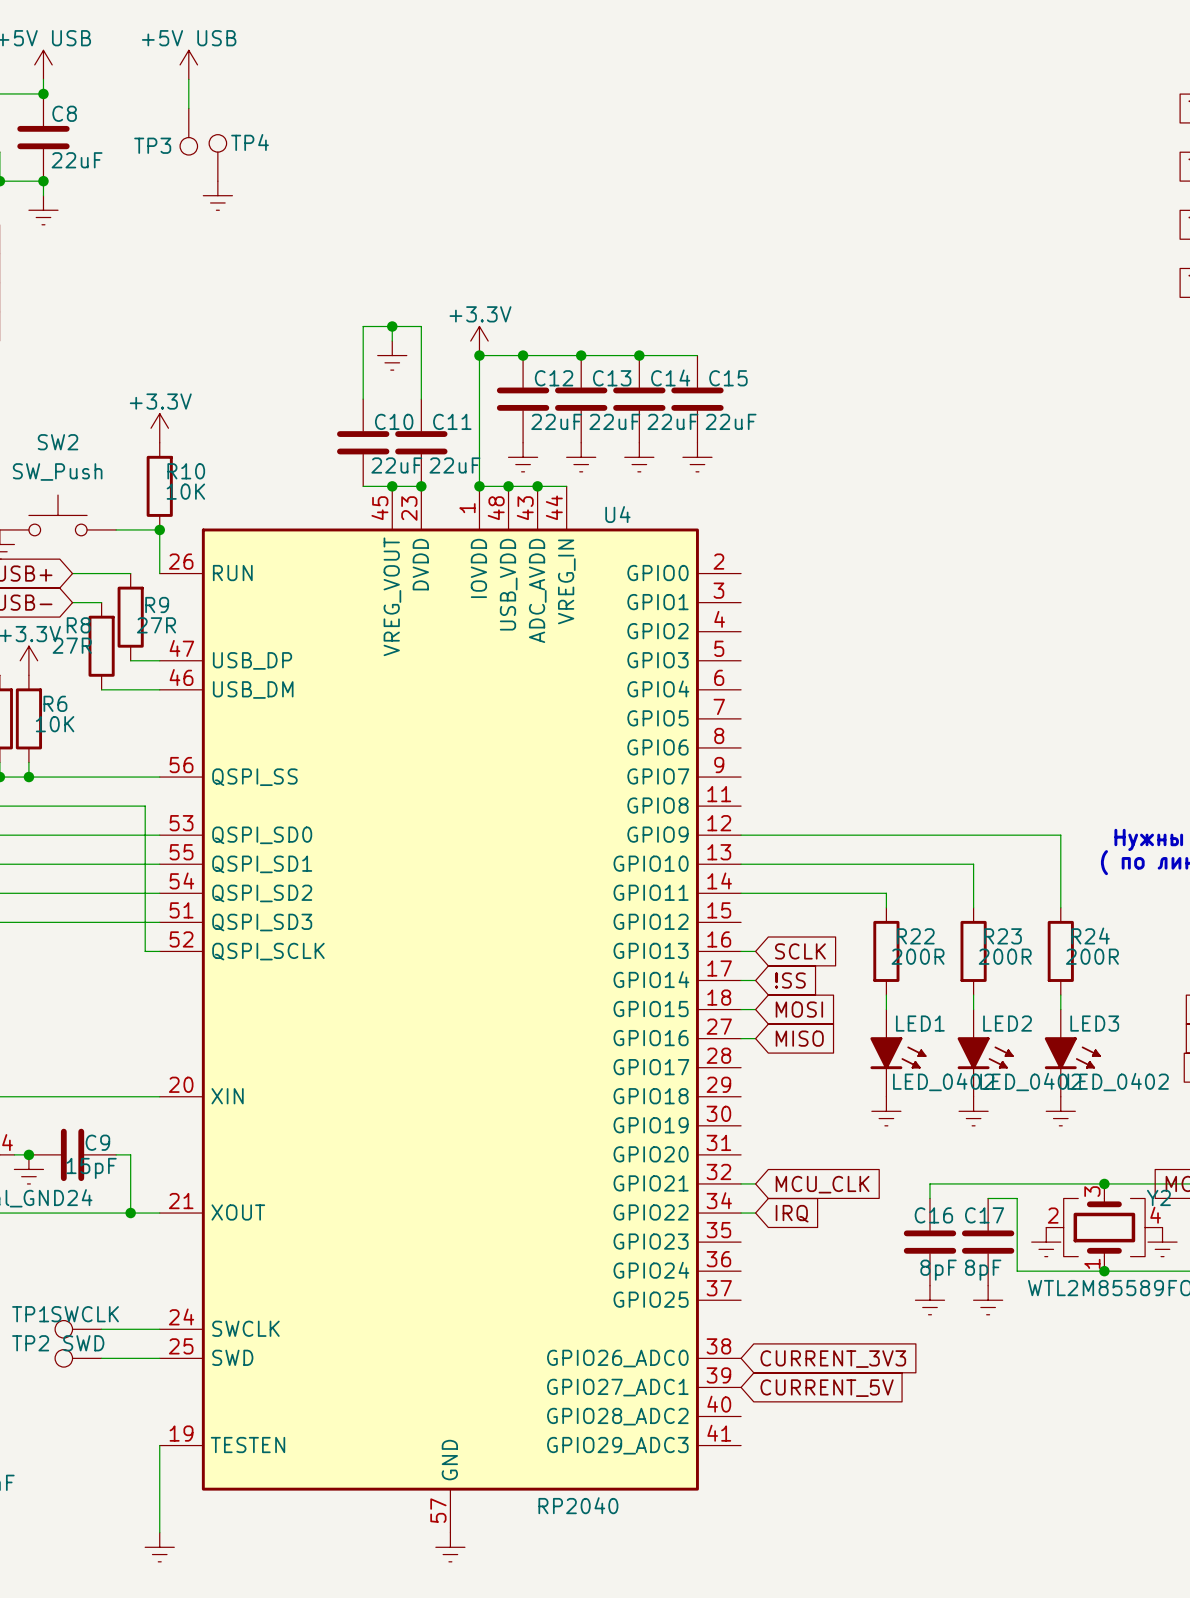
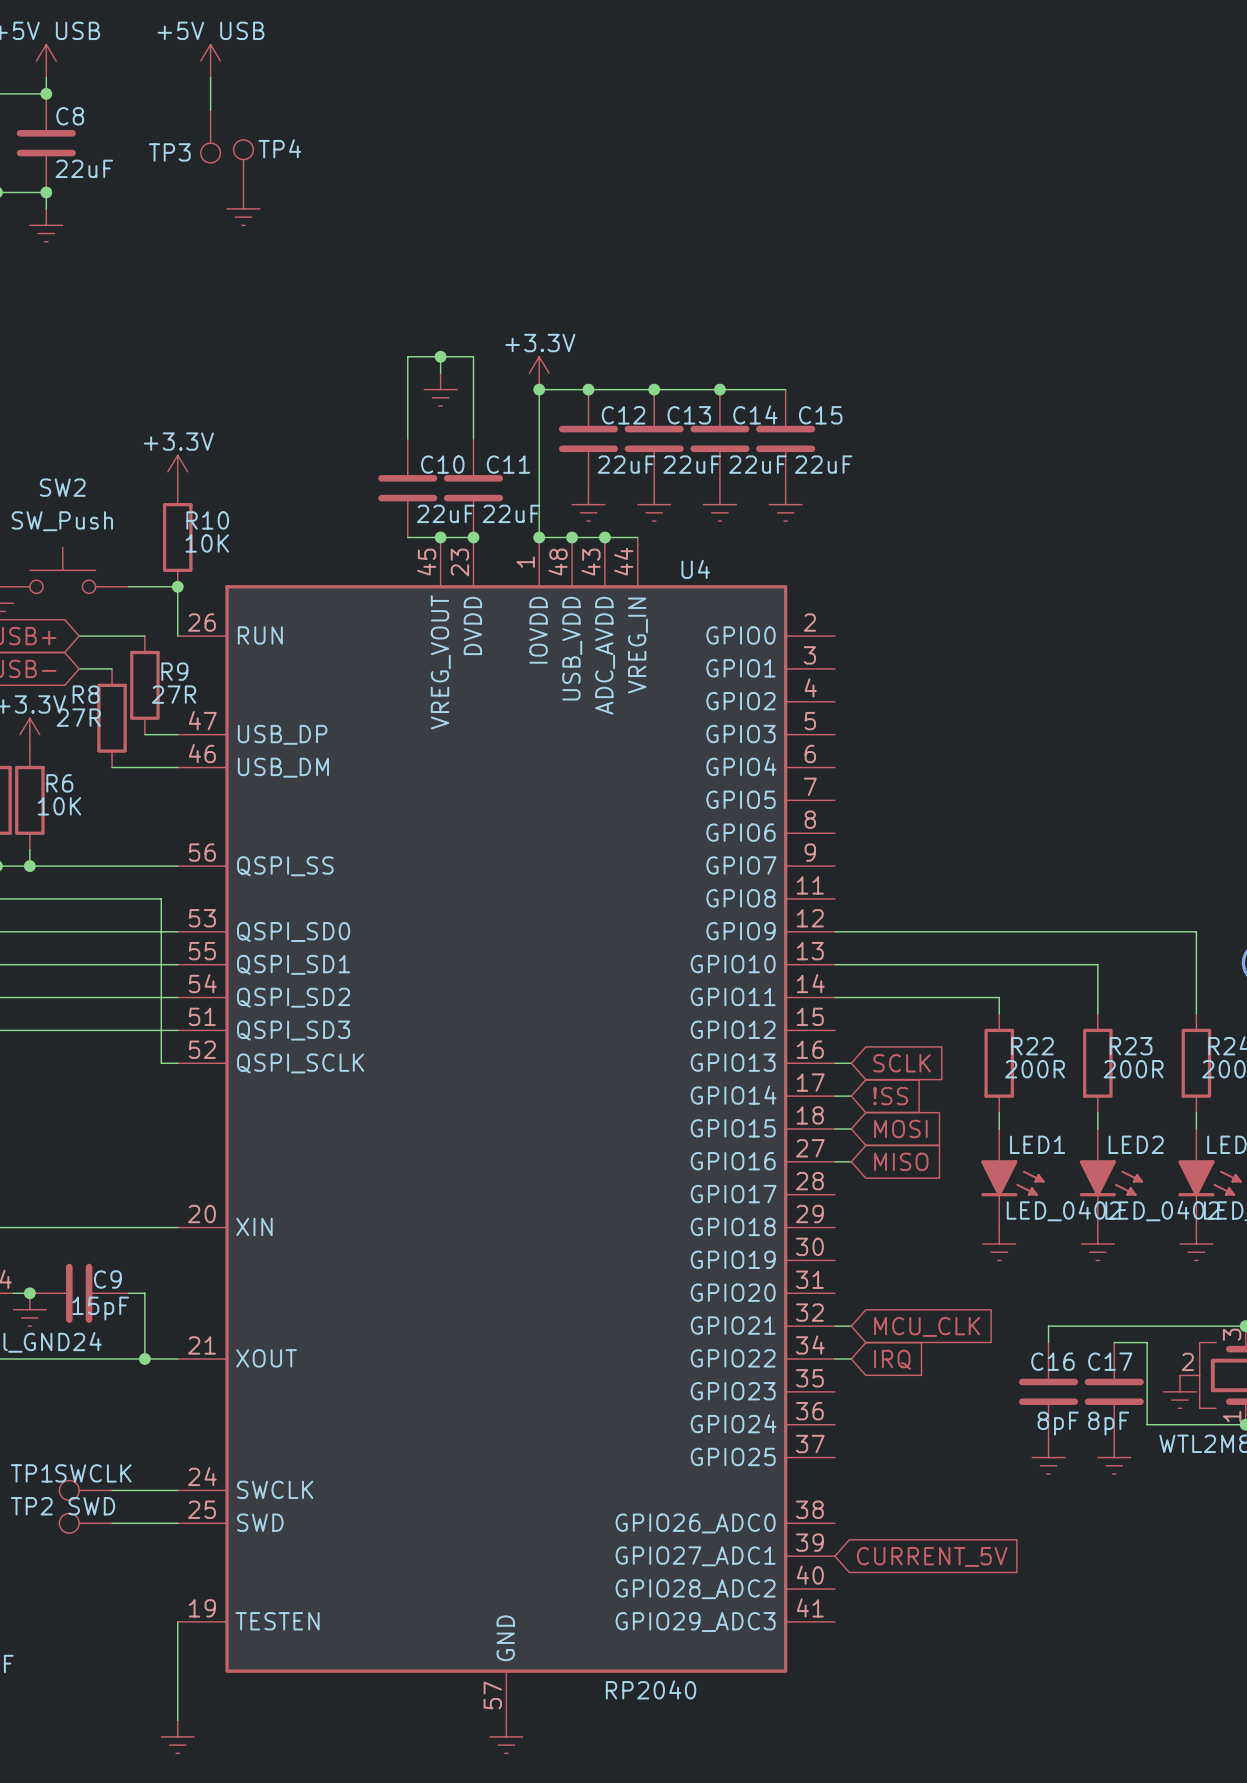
global label: CURRENT_3V3 (833, 1359) -> none

